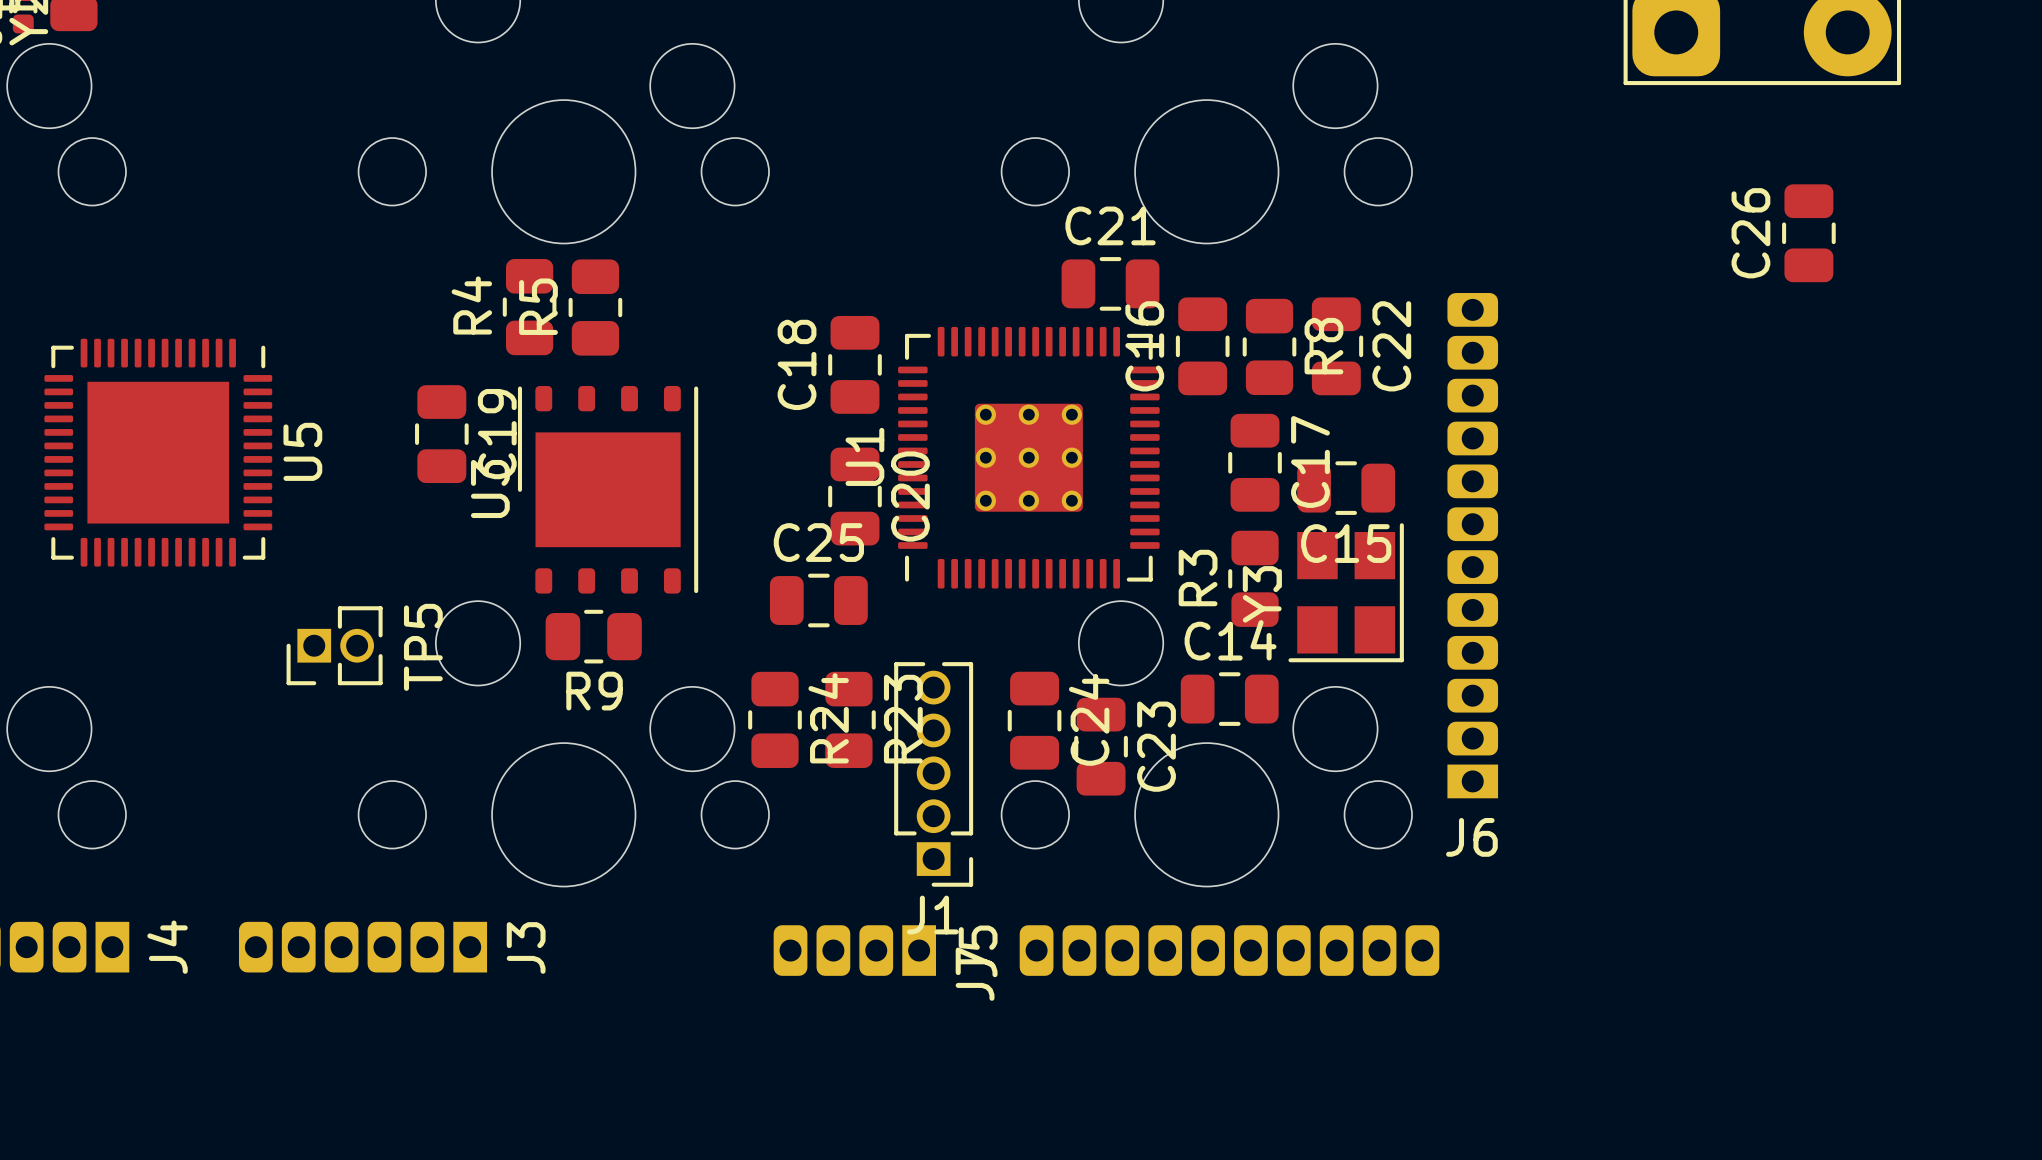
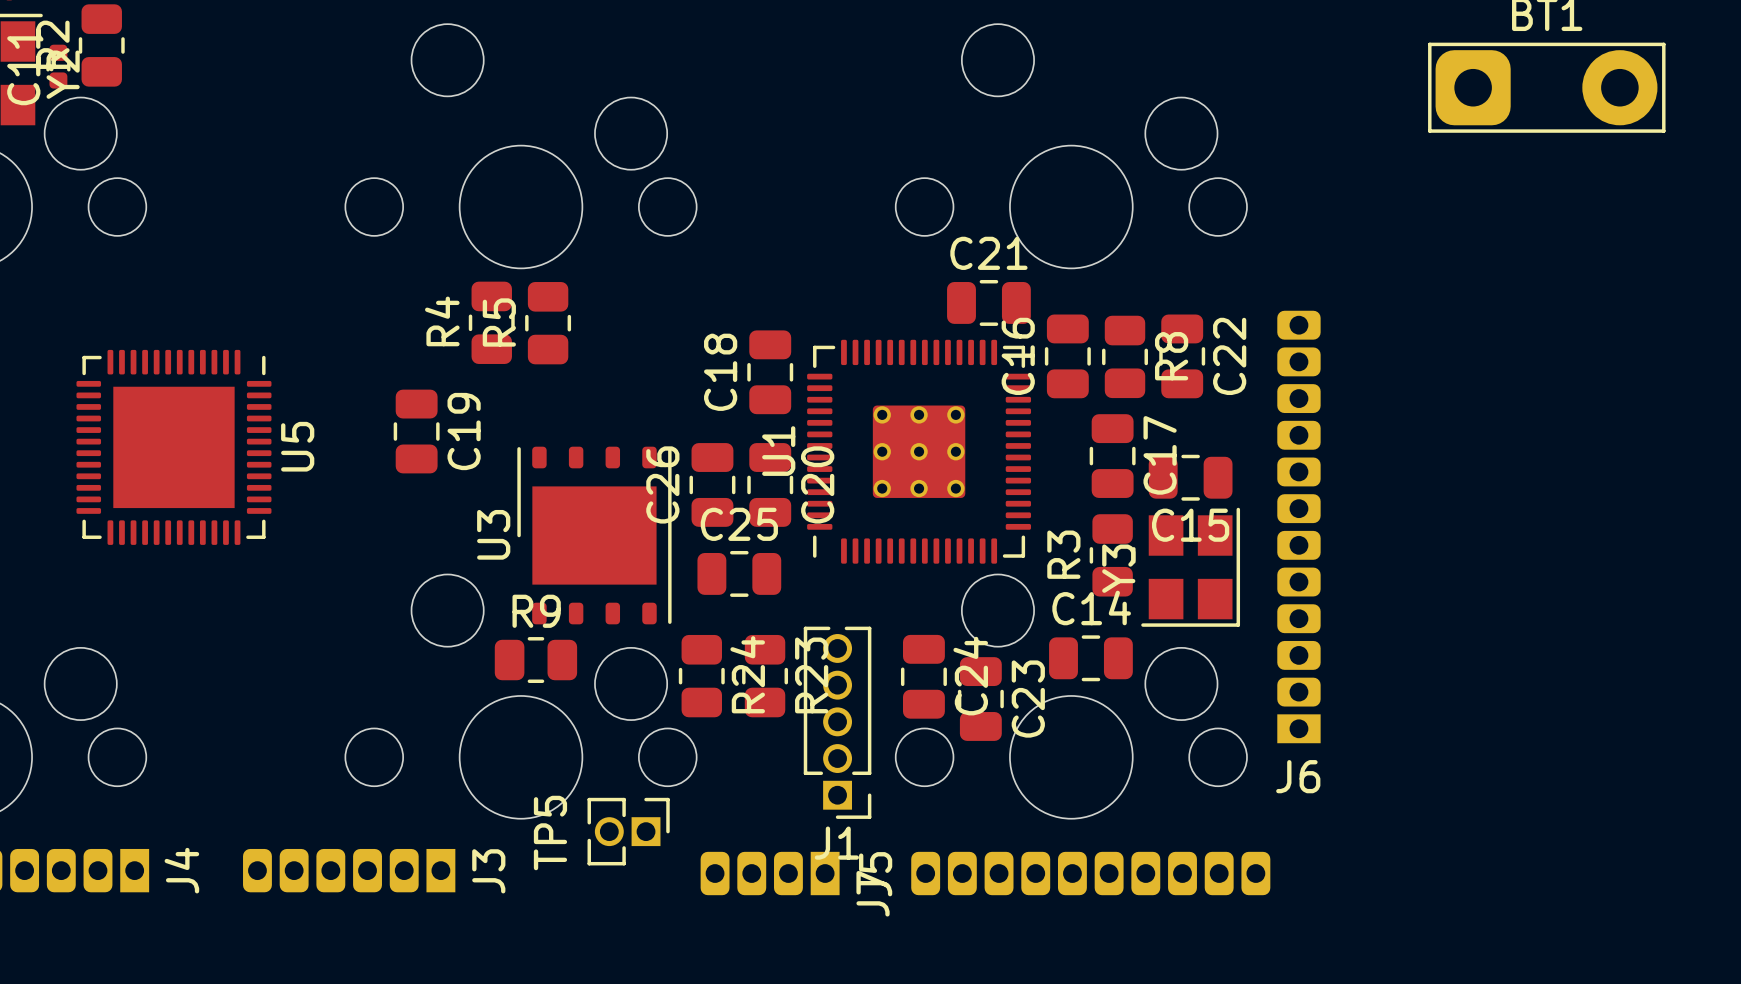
C26 position: (1808, 233) -> (712, 484)
U3 position: (608, 489) -> (594, 535)
R9 position: (593, 636) -> (535, 660)
TP5 rotation: 0° (334, 645) -> 180° (628, 831)
TP5 position: (334, 645) -> (628, 831)
R9 name position: R9 (594, 691) -> R9 (536, 611)

